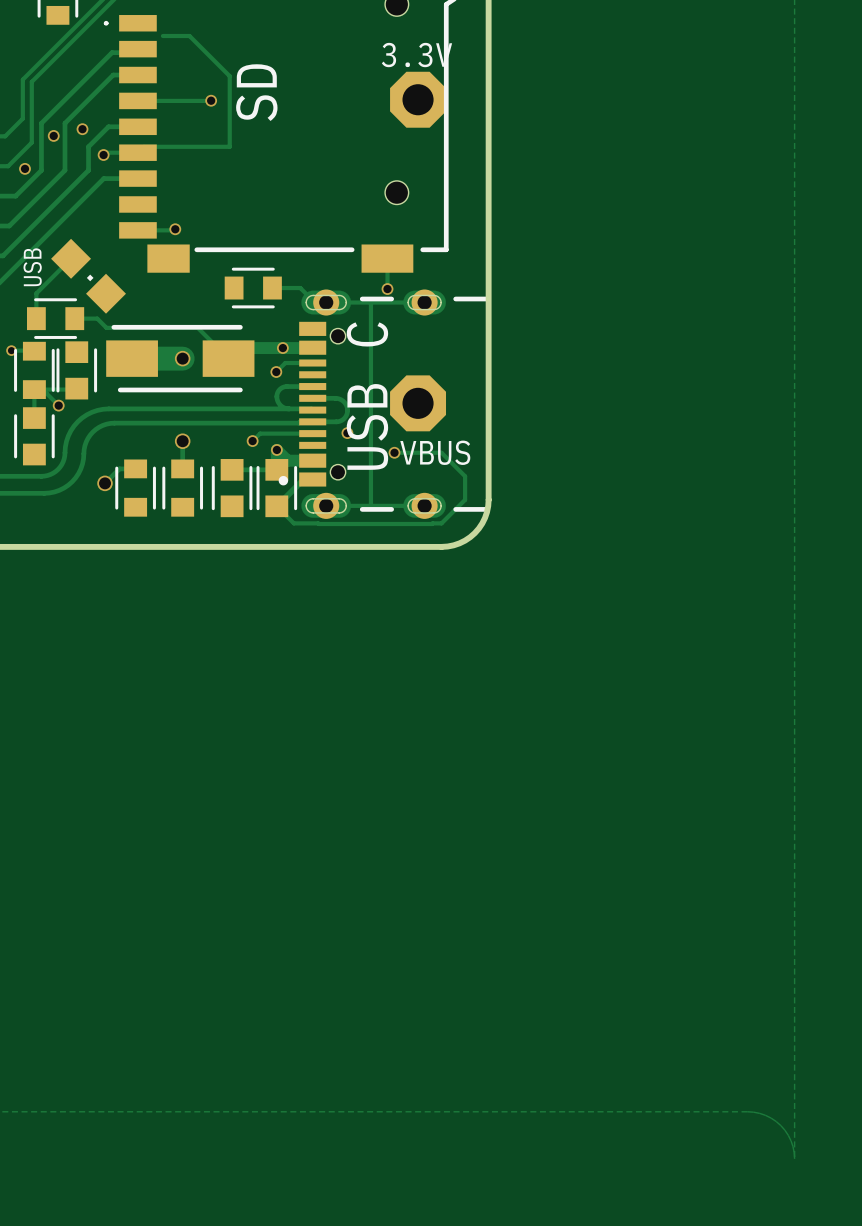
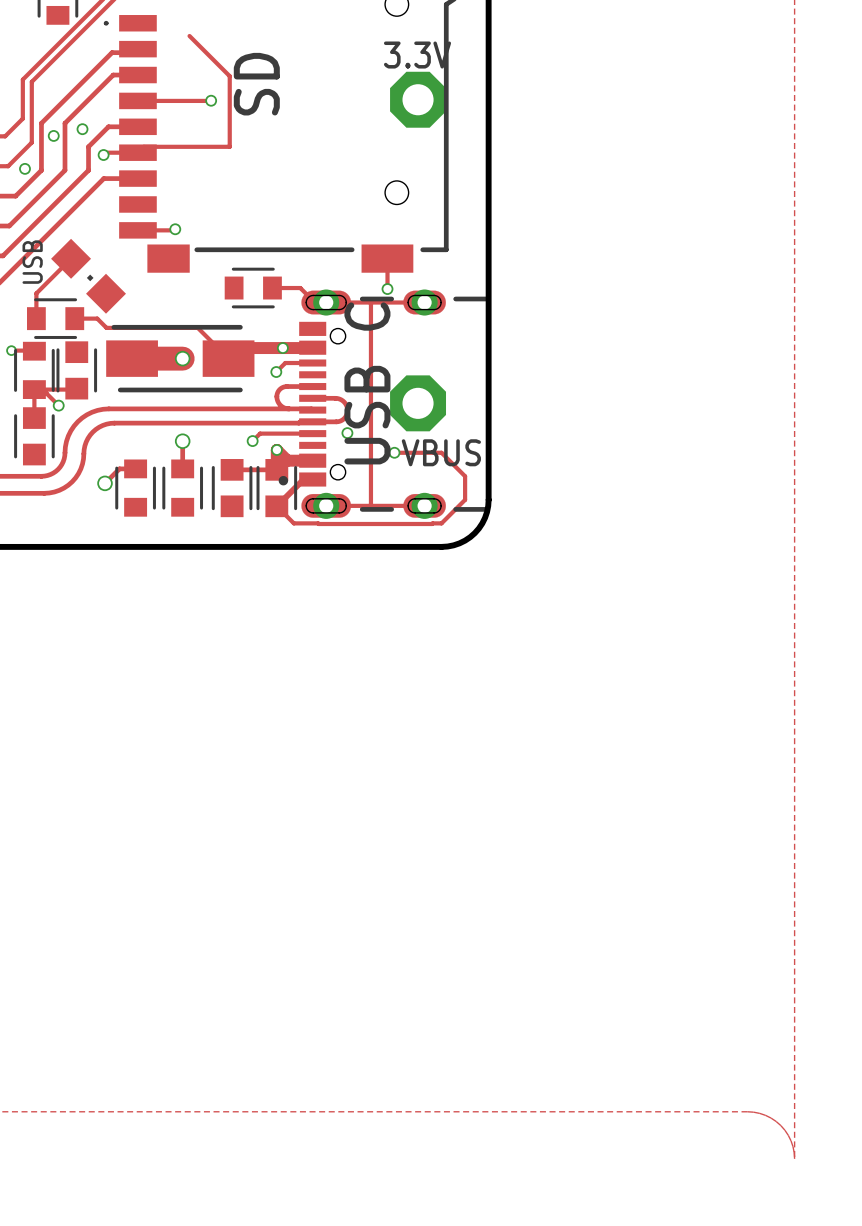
track: (162, 36) (189, 36) -> none

